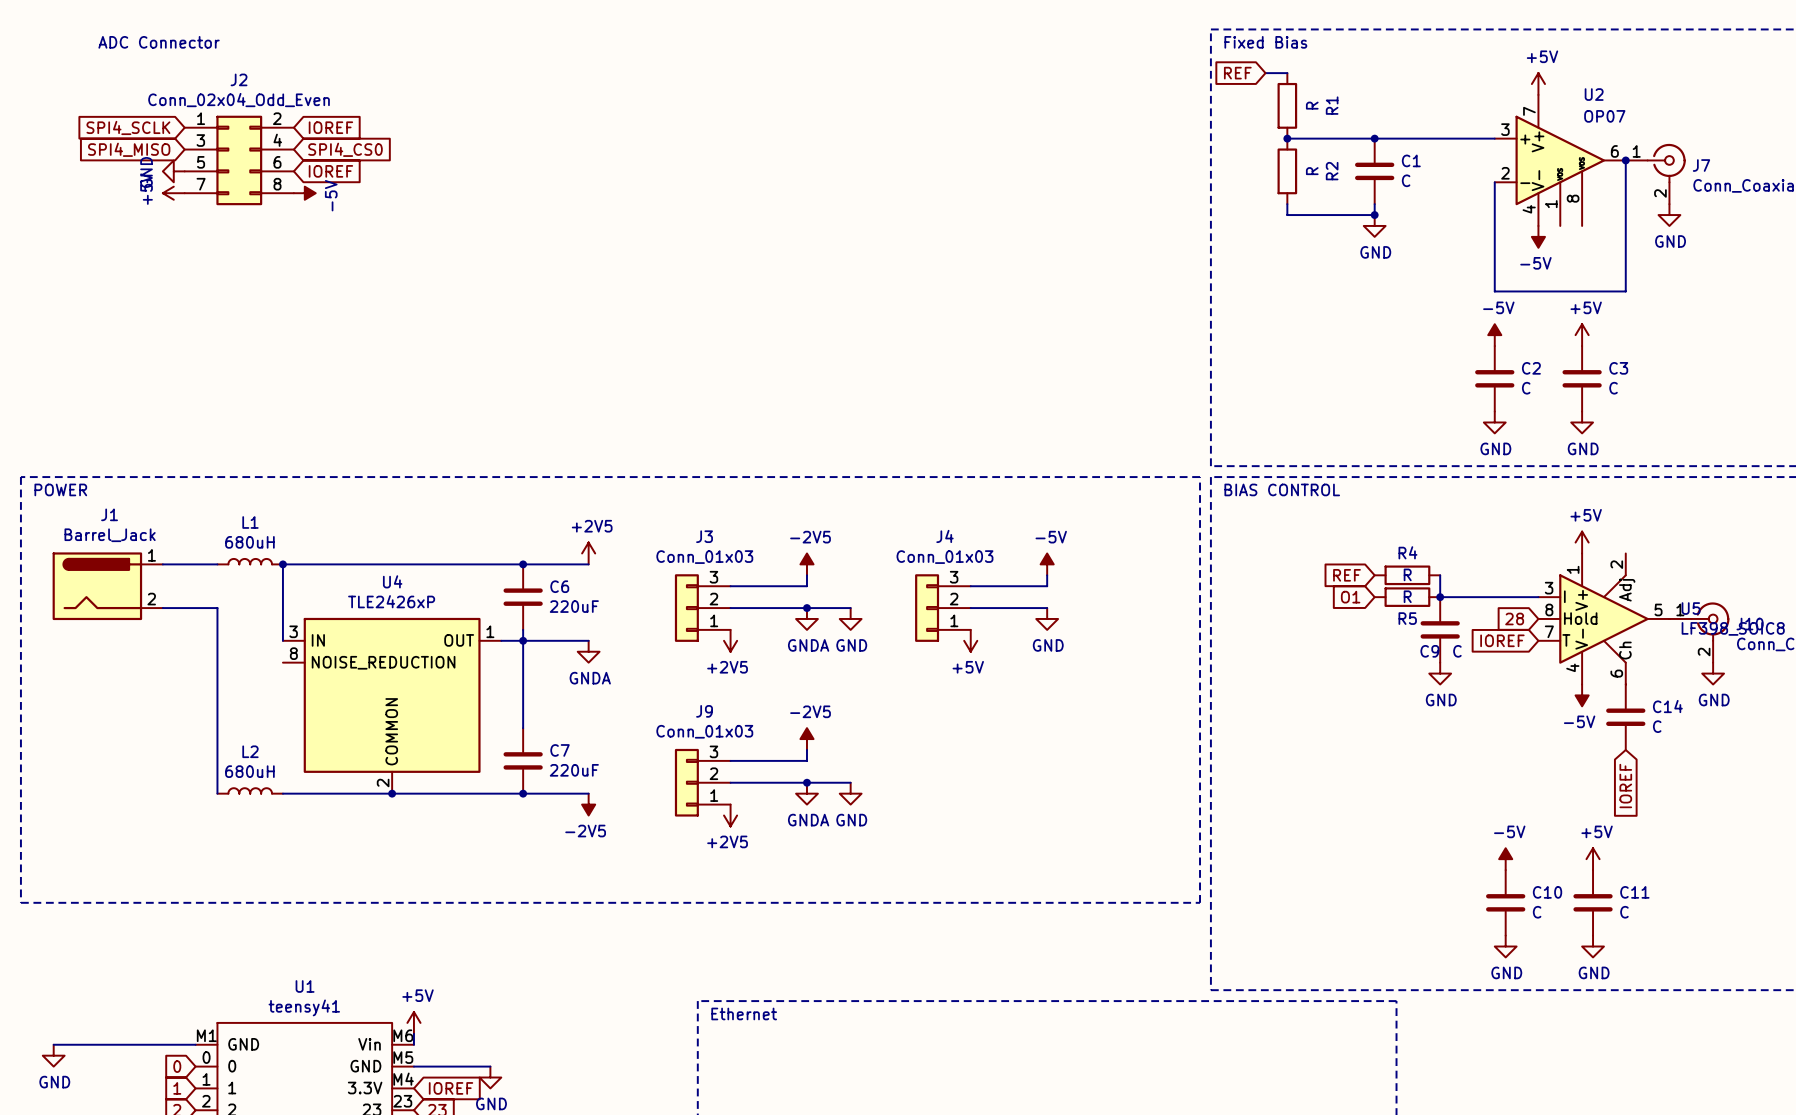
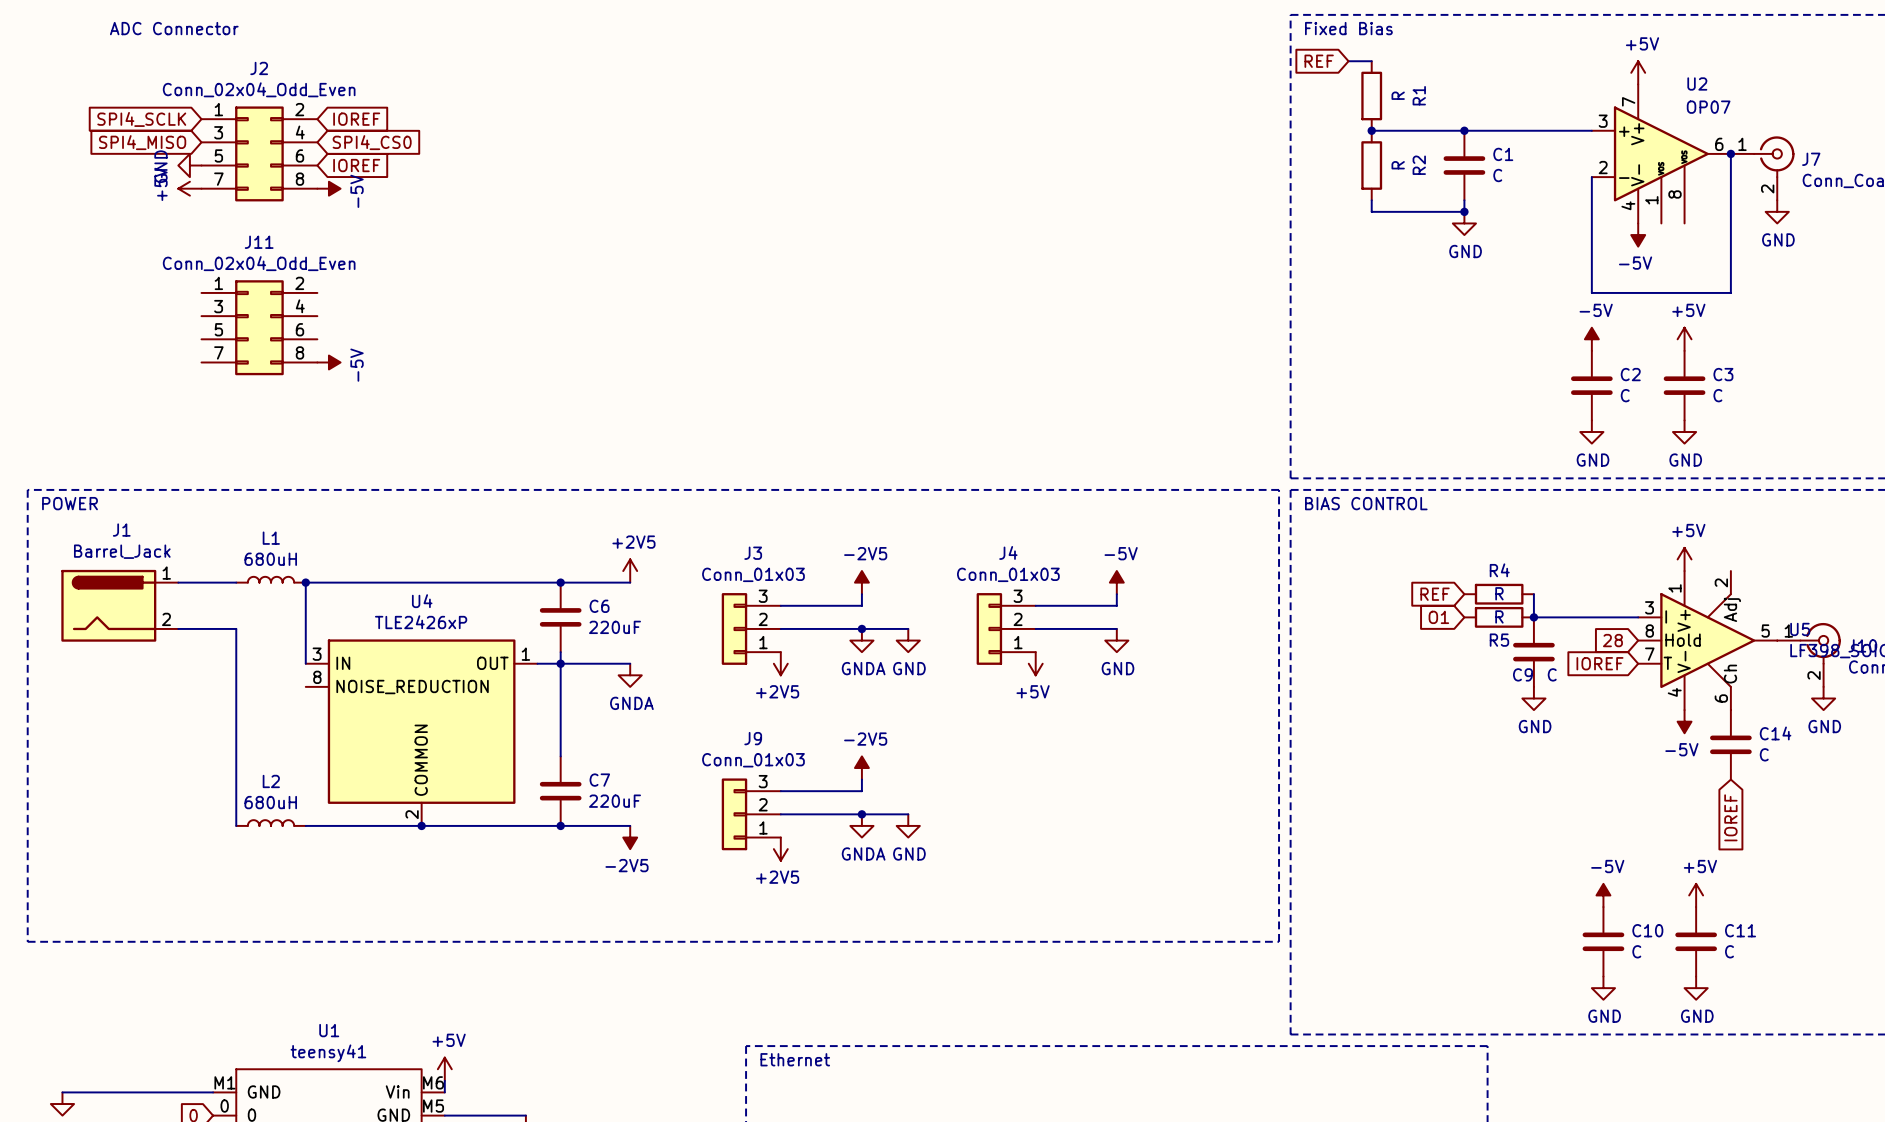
J11: none -> Conn_02x04_Odd_Even (259, 327)
power symbol: none -> -5V (328, 362)

